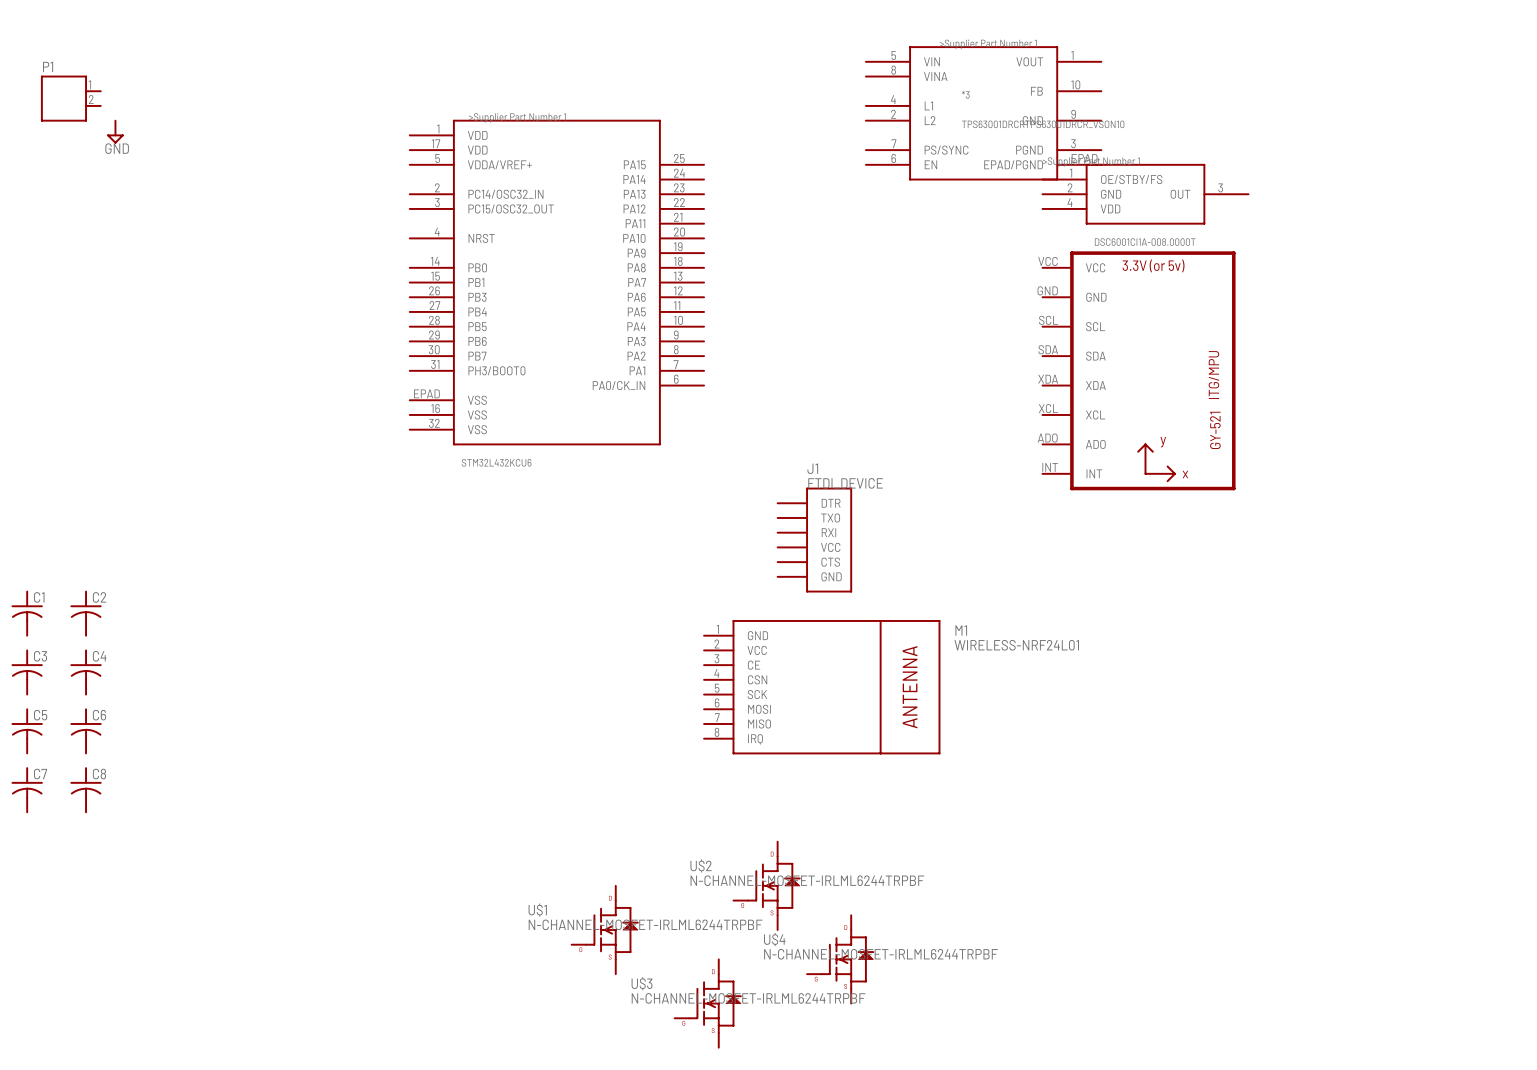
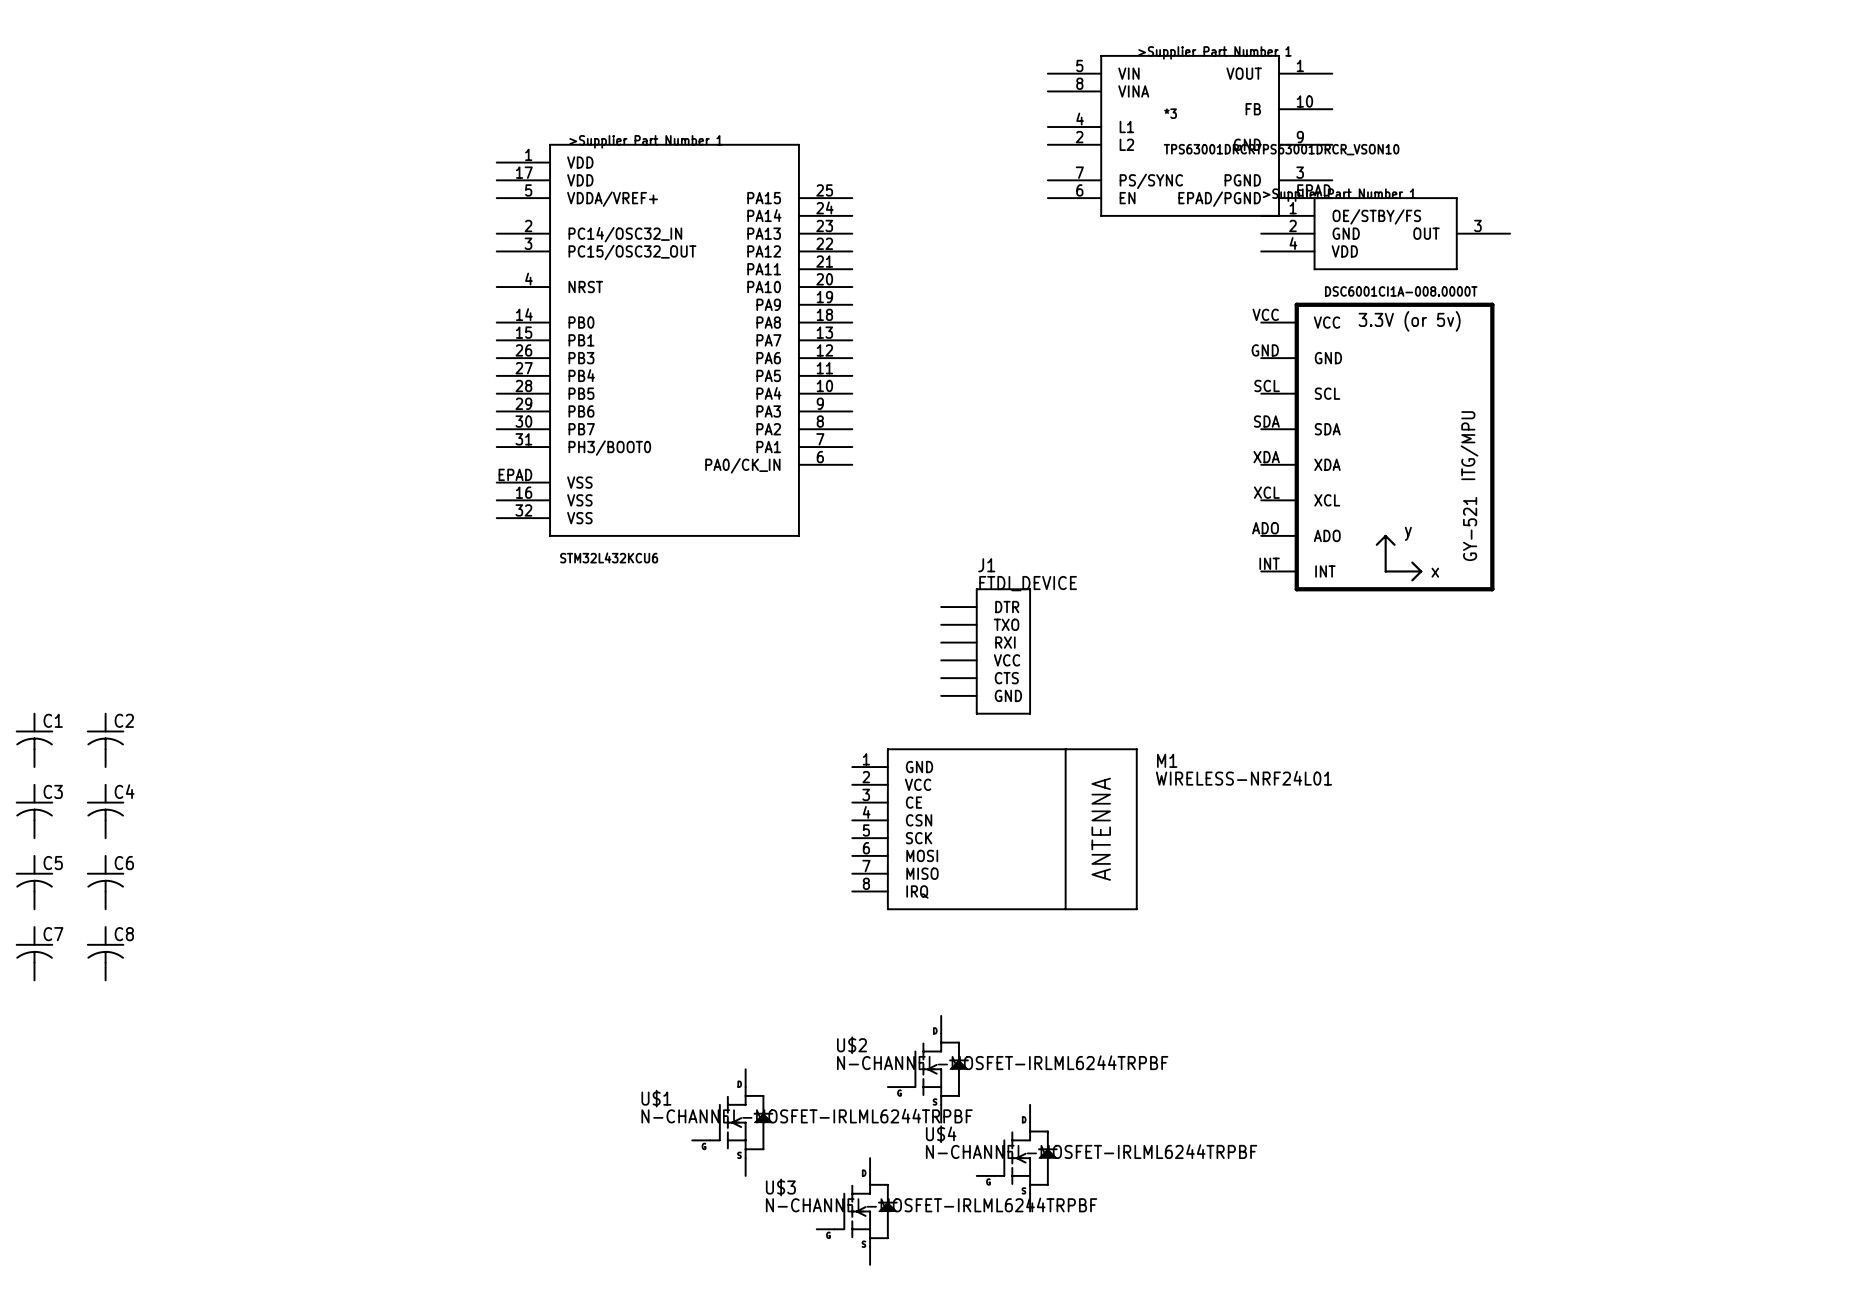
P1: (71, 98) -> none
power symbol: GND (115, 132) -> none

